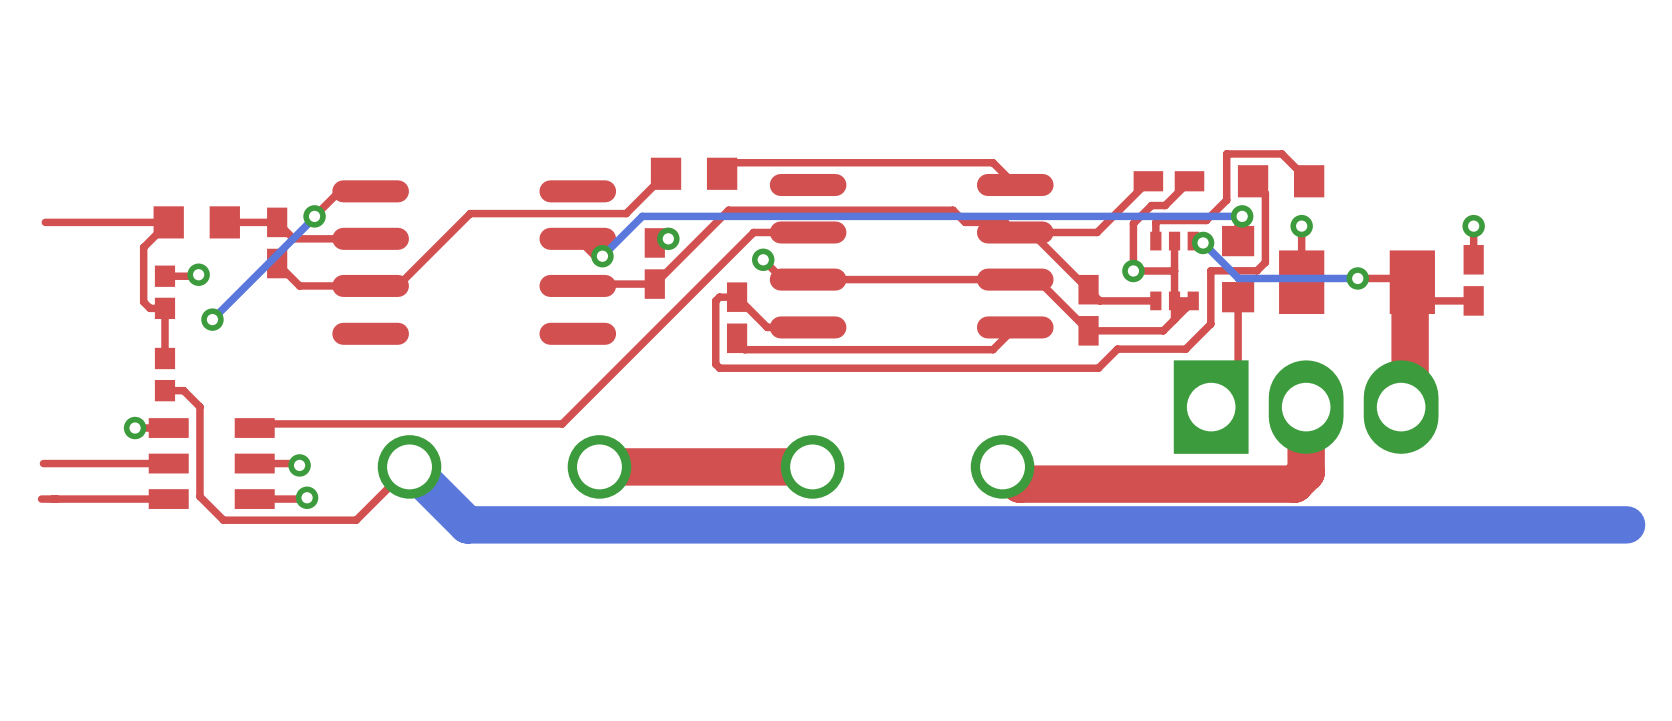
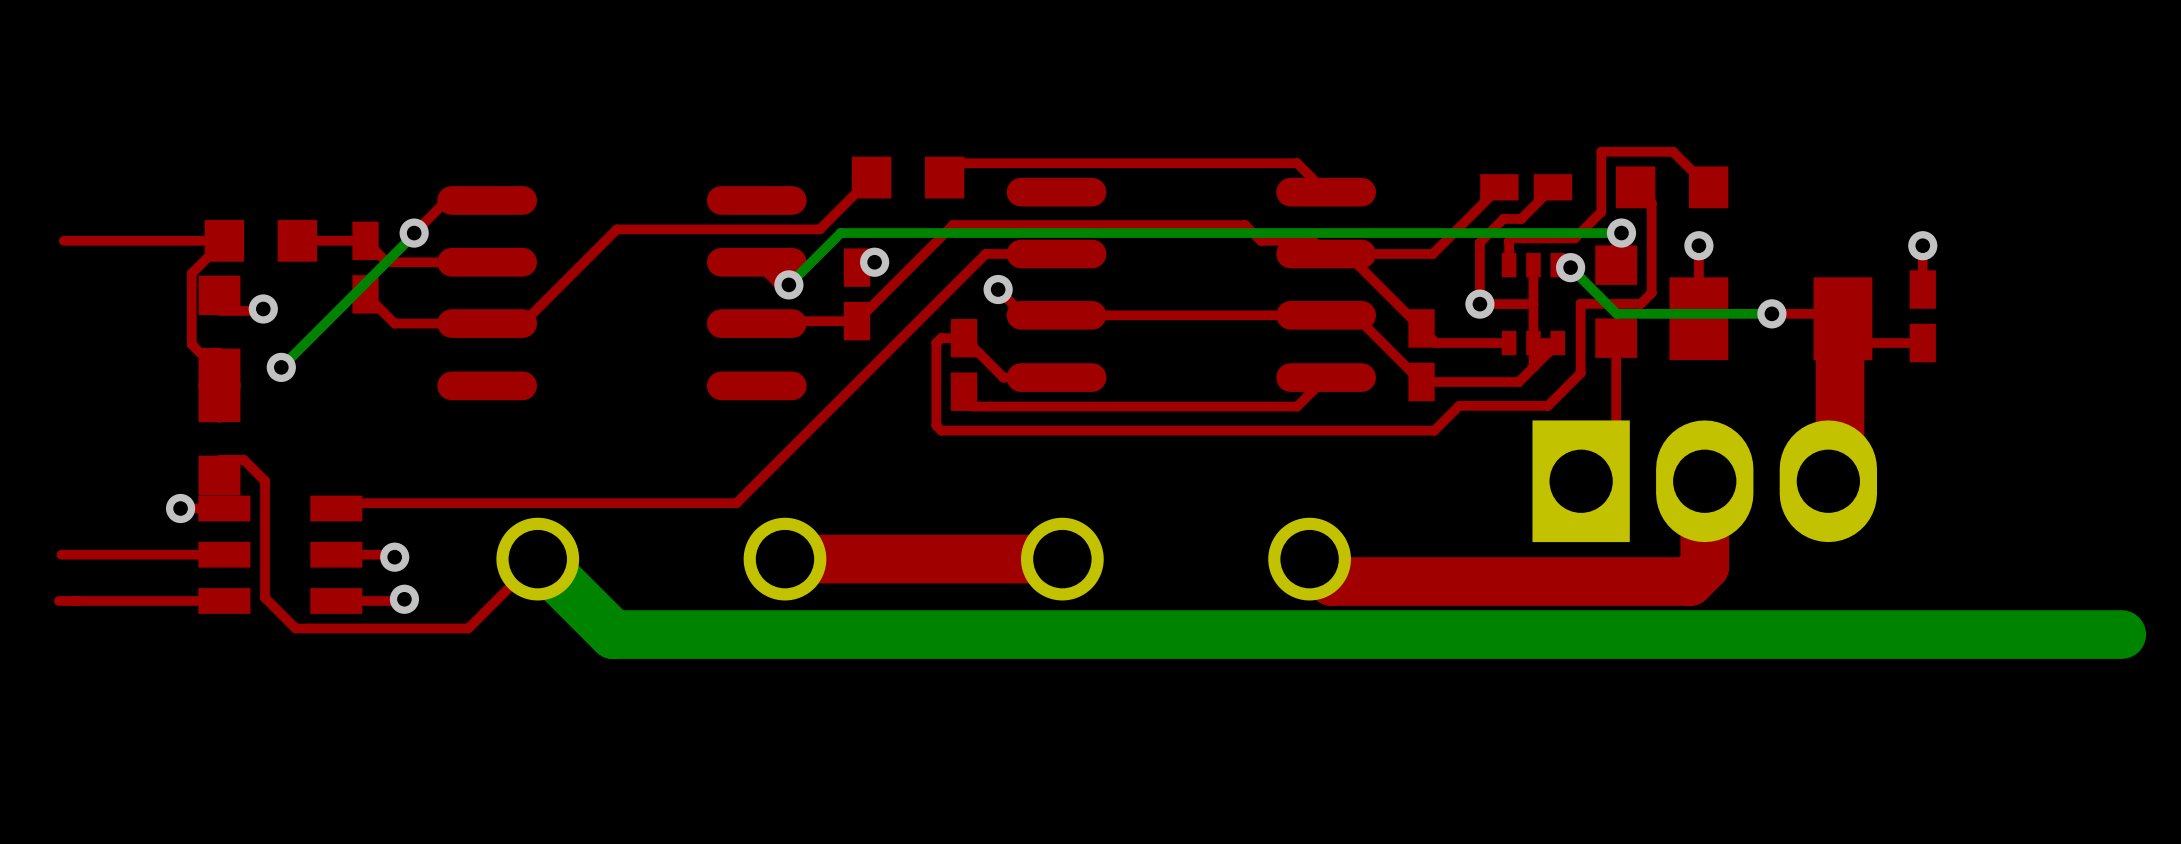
part footprint: [154, 265, 176, 320] -> [198, 275, 241, 389]
part footprint: [154, 347, 176, 402] -> [198, 382, 241, 496]

